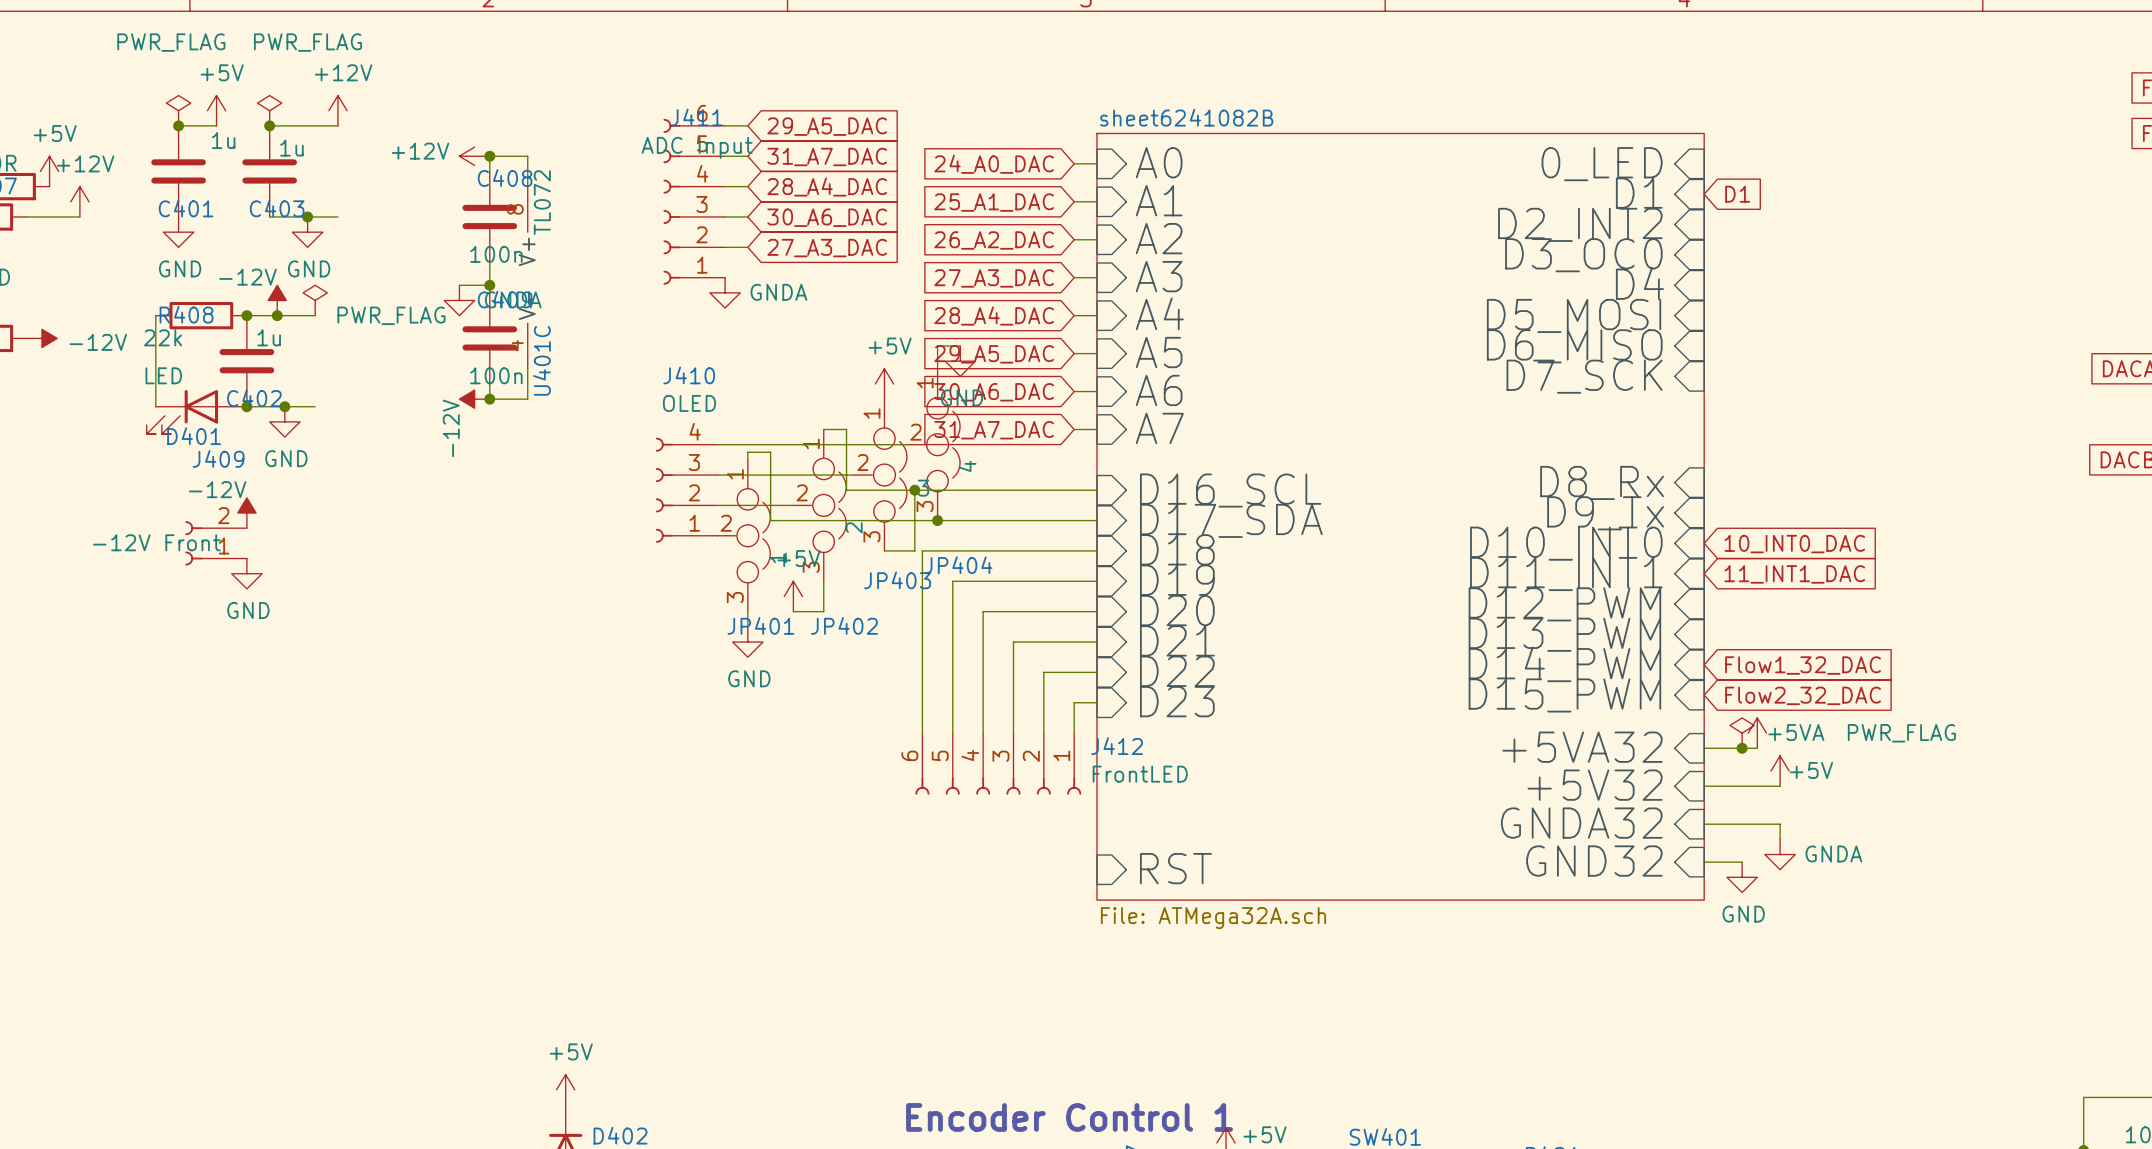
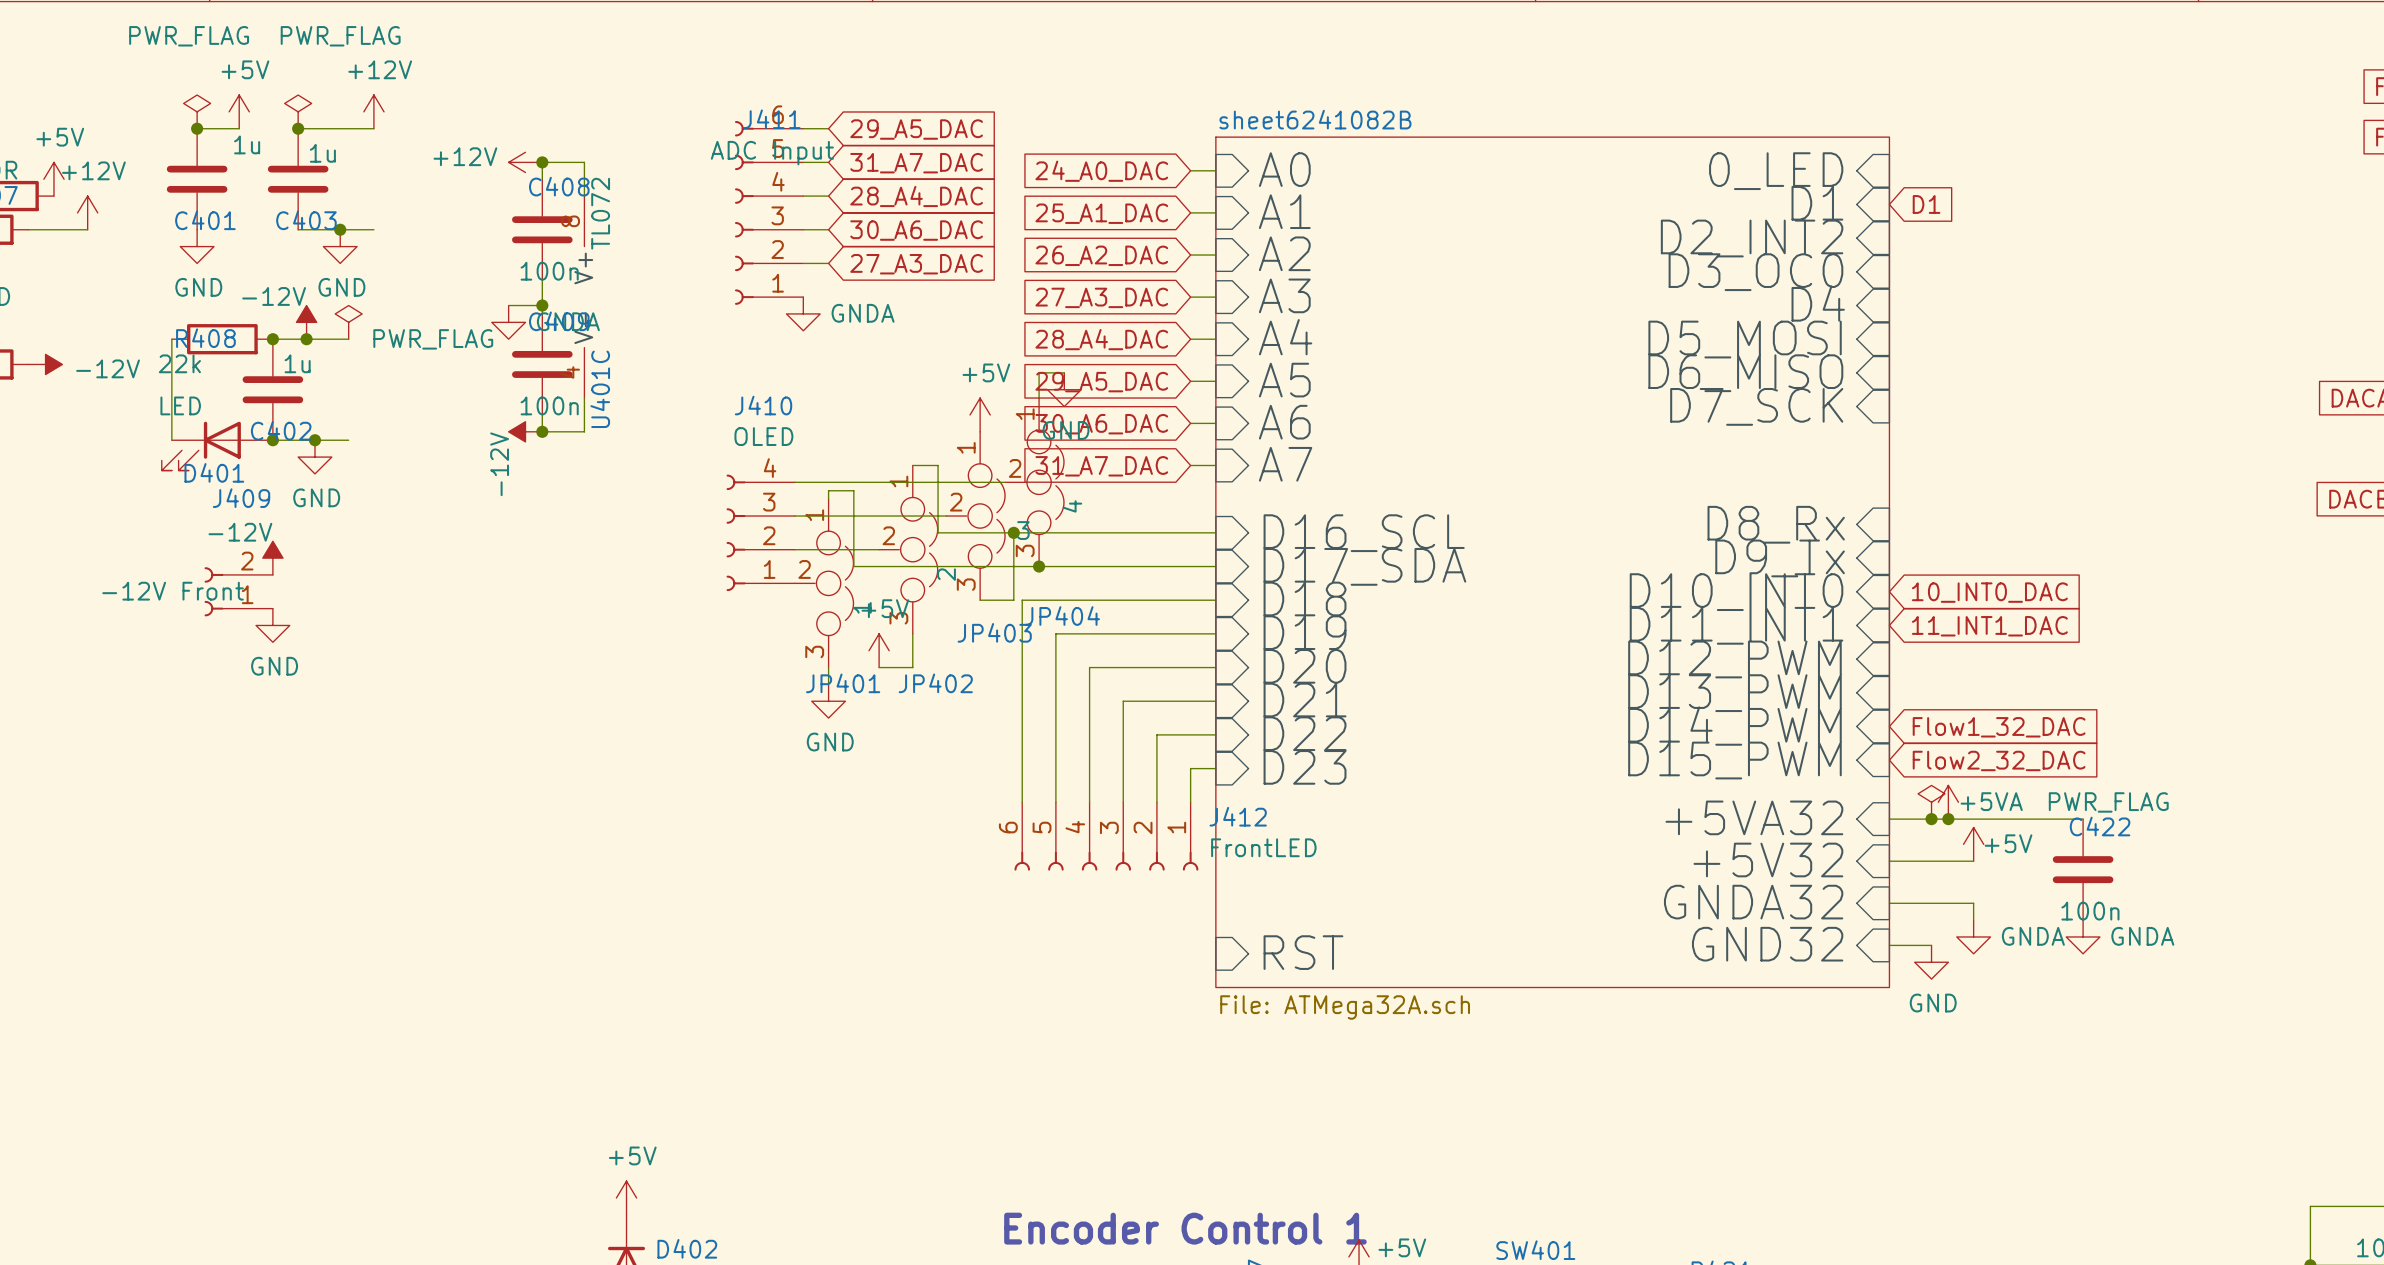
wire: none -> (1948, 819) (2083, 819)
junction: none -> (1948, 819)
C422: none -> 100n (2083, 869)
power symbol: none -> GNDA (2083, 936)

